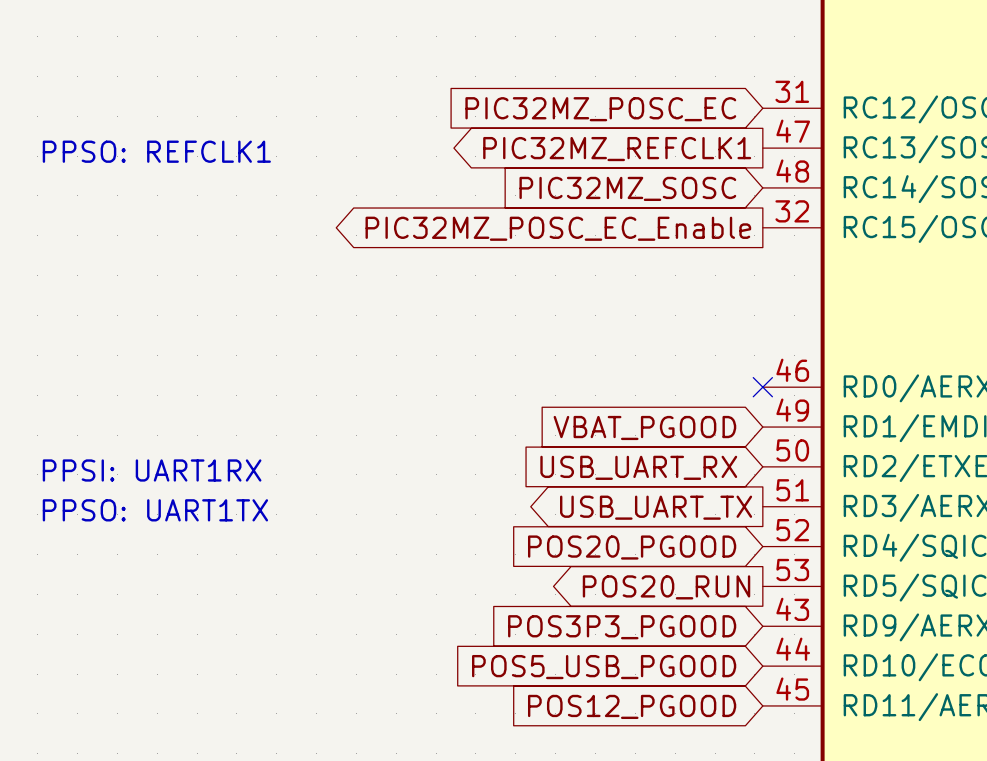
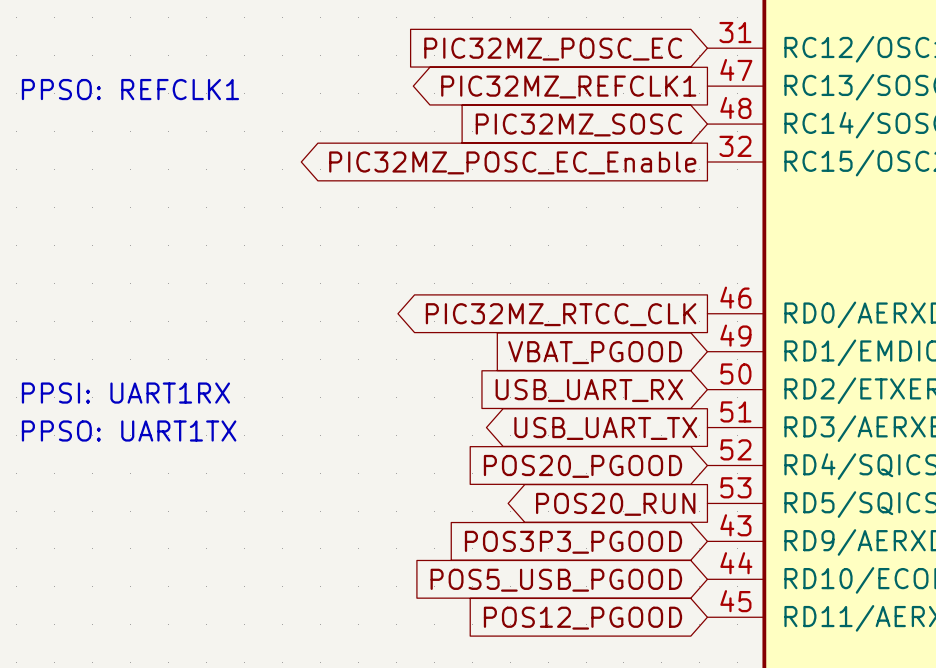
no-connect mark: (762, 387) -> none
global label: none -> PIC32MZ_RTCC_CLK (561, 314)

